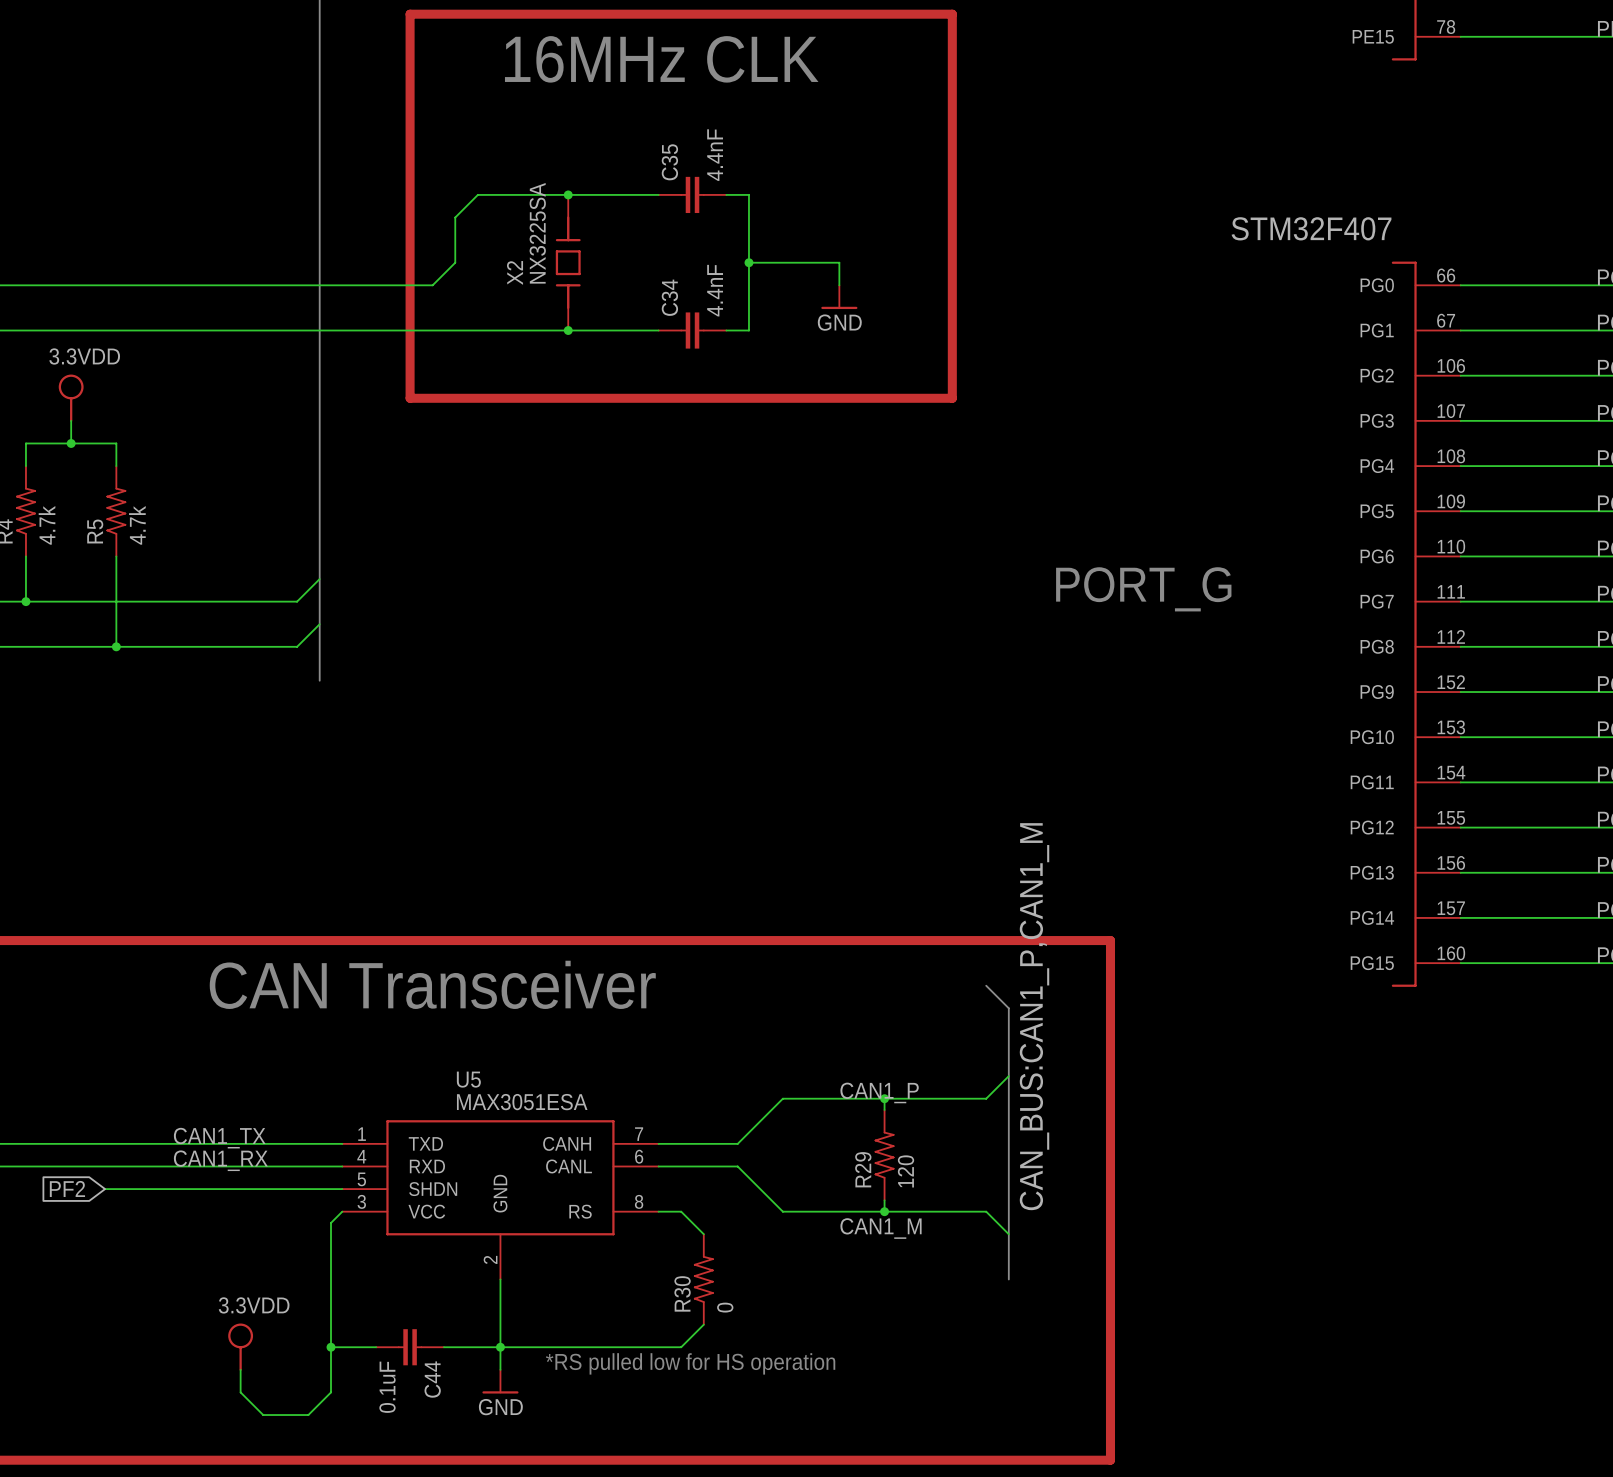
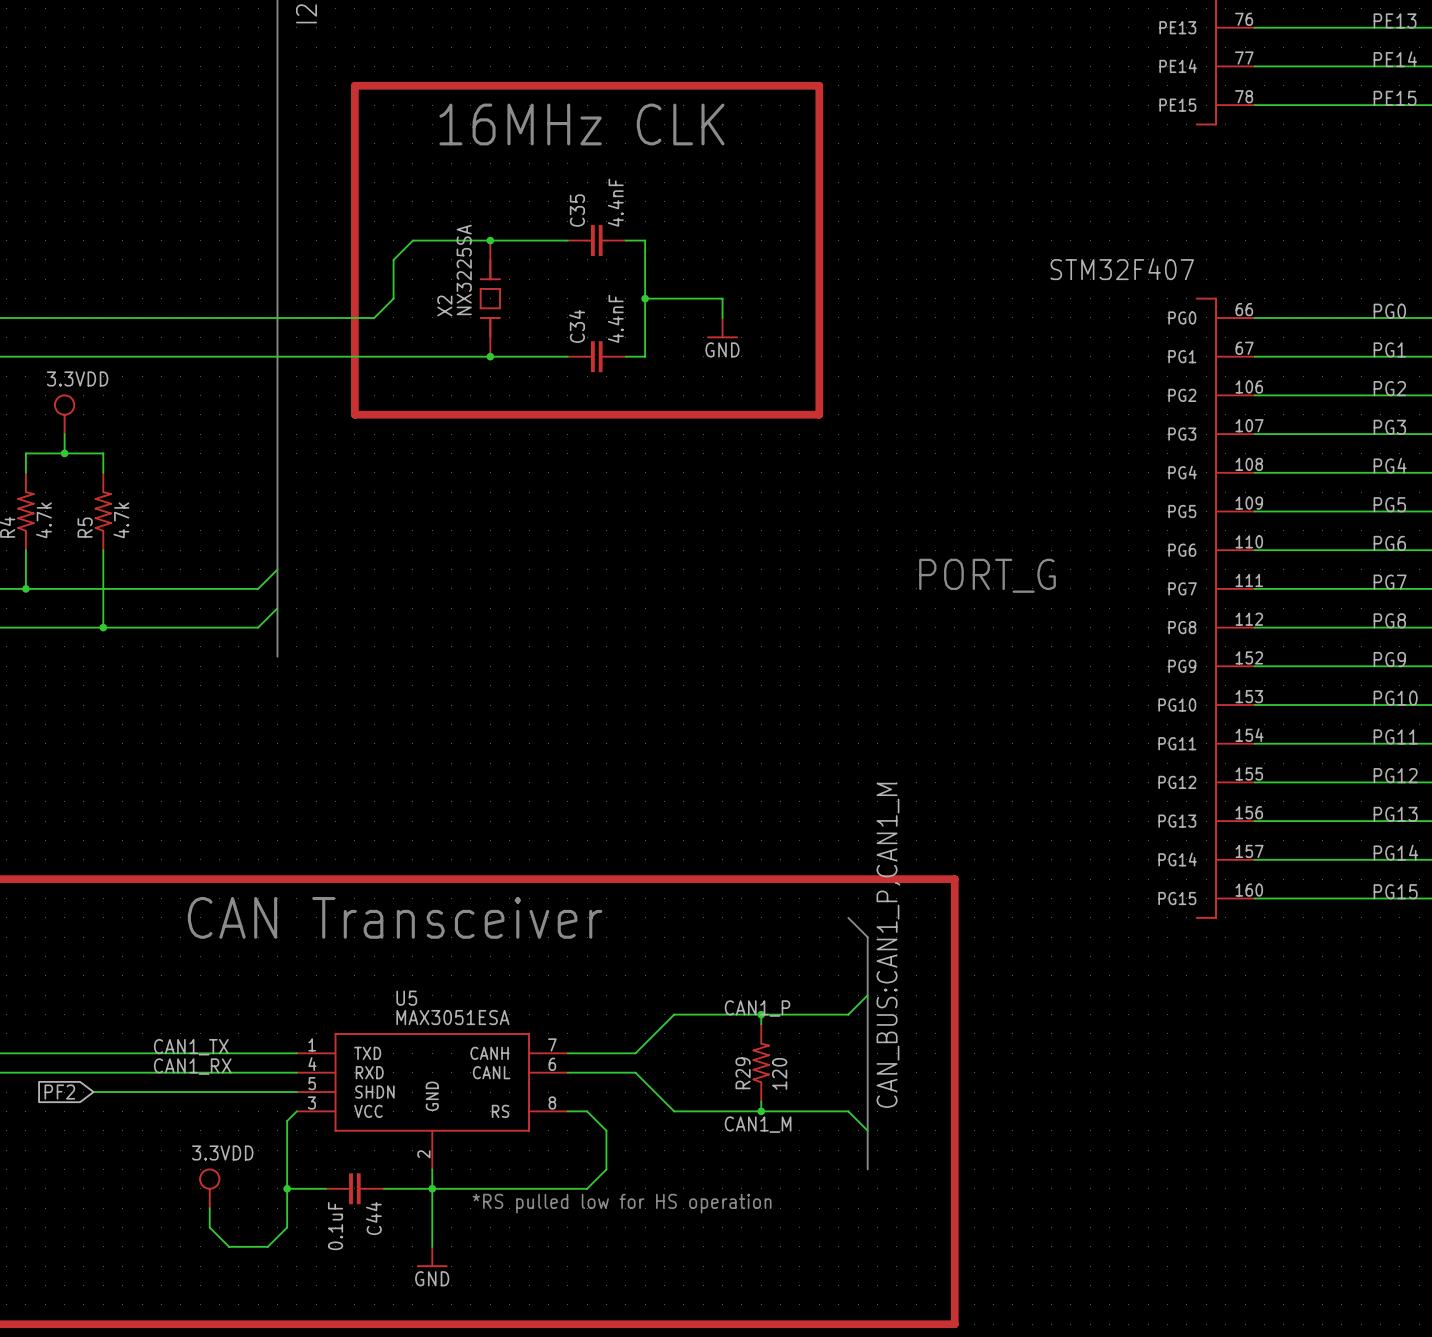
wire: none -> (606, 1130) (606, 1169) (587, 1188) (383, 1188)
R30: 0 (703, 1279) -> none
wire: none -> (287, 1188) (325, 1188)
wire: none -> (209, 1208) (209, 1227) (229, 1246) (267, 1246) (287, 1227)
wire: (703, 1324) (681, 1347) (443, 1347) -> none
power symbol position: 3.3VDD (240, 1347) -> 3.3VDD (209, 1188)
junction position: (331, 1347) -> (287, 1188)
wire: (376, 1347) (331, 1347) (331, 1392) (308, 1415) (263, 1415) (240, 1392) (240, 1369) -> none
C44 position: (410, 1347) -> (354, 1188)
junction position: (500, 1347) -> (432, 1188)
text position: *RS pulled low for HS operation (690, 1363) -> *RS pulled low for HS operation (622, 1203)

